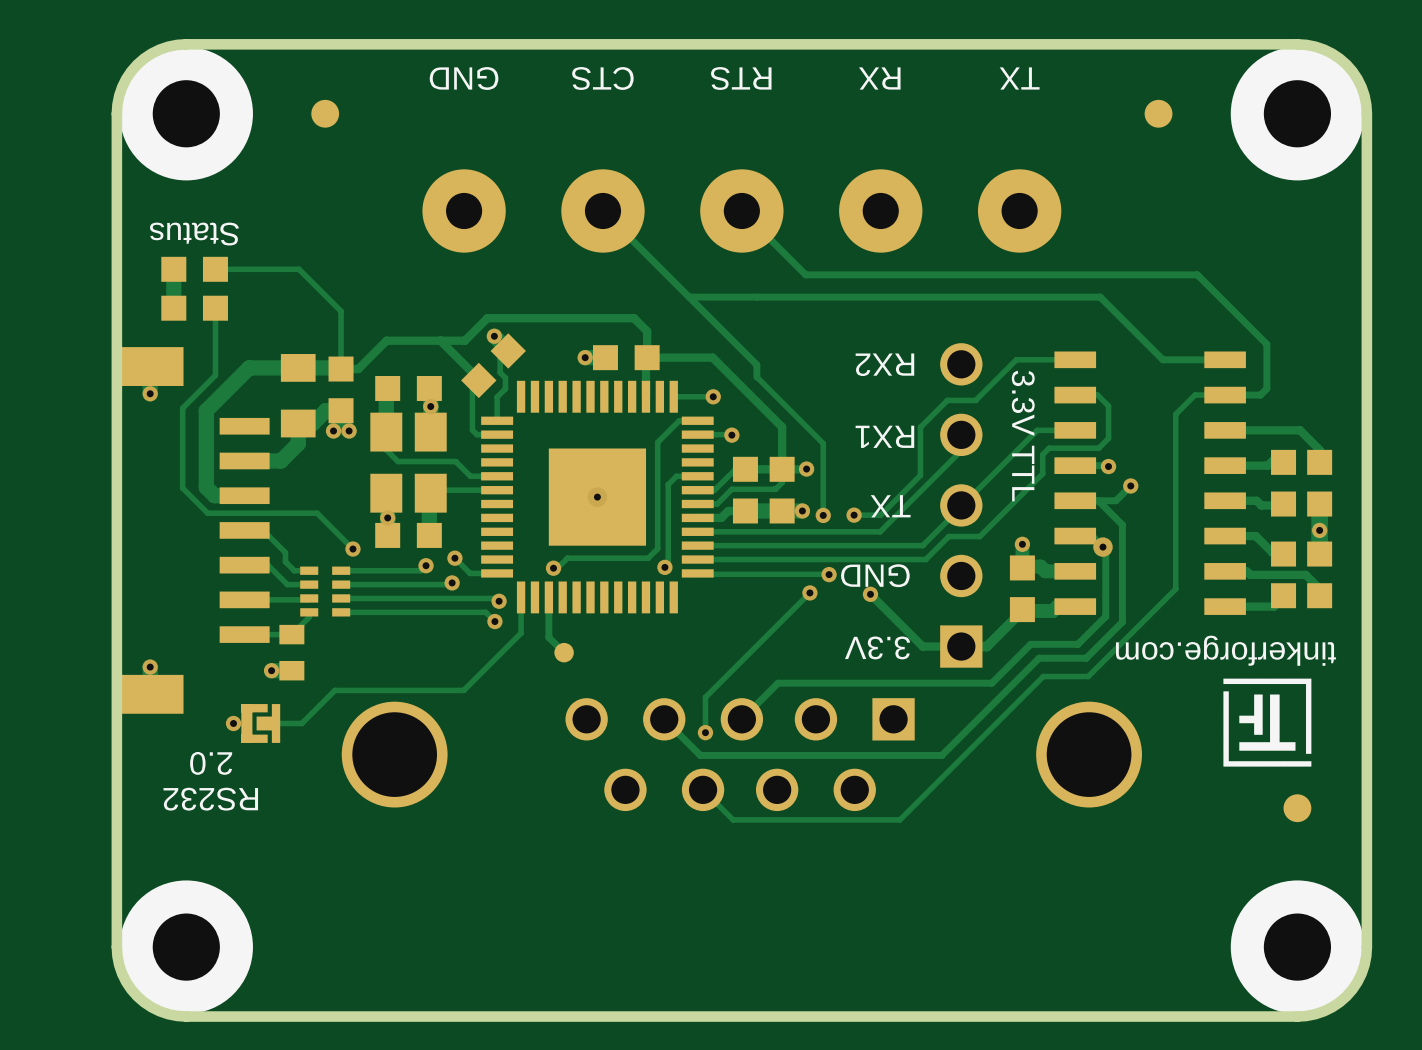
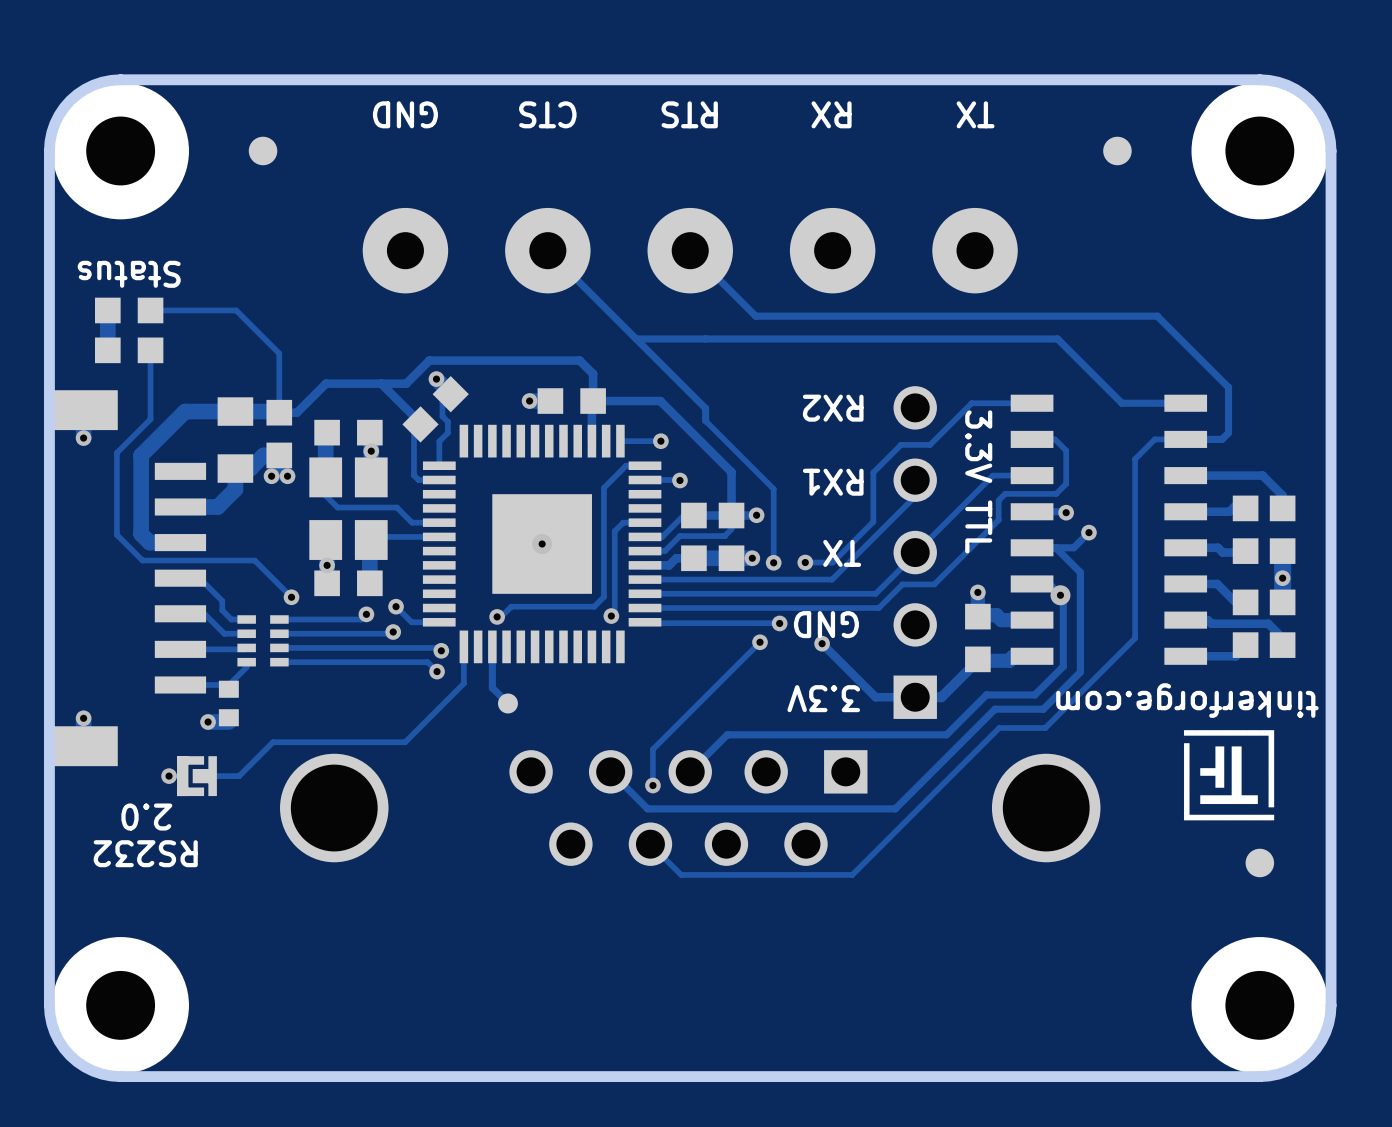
part footprint: [279, 624, 305, 681] -> [218, 680, 239, 727]

